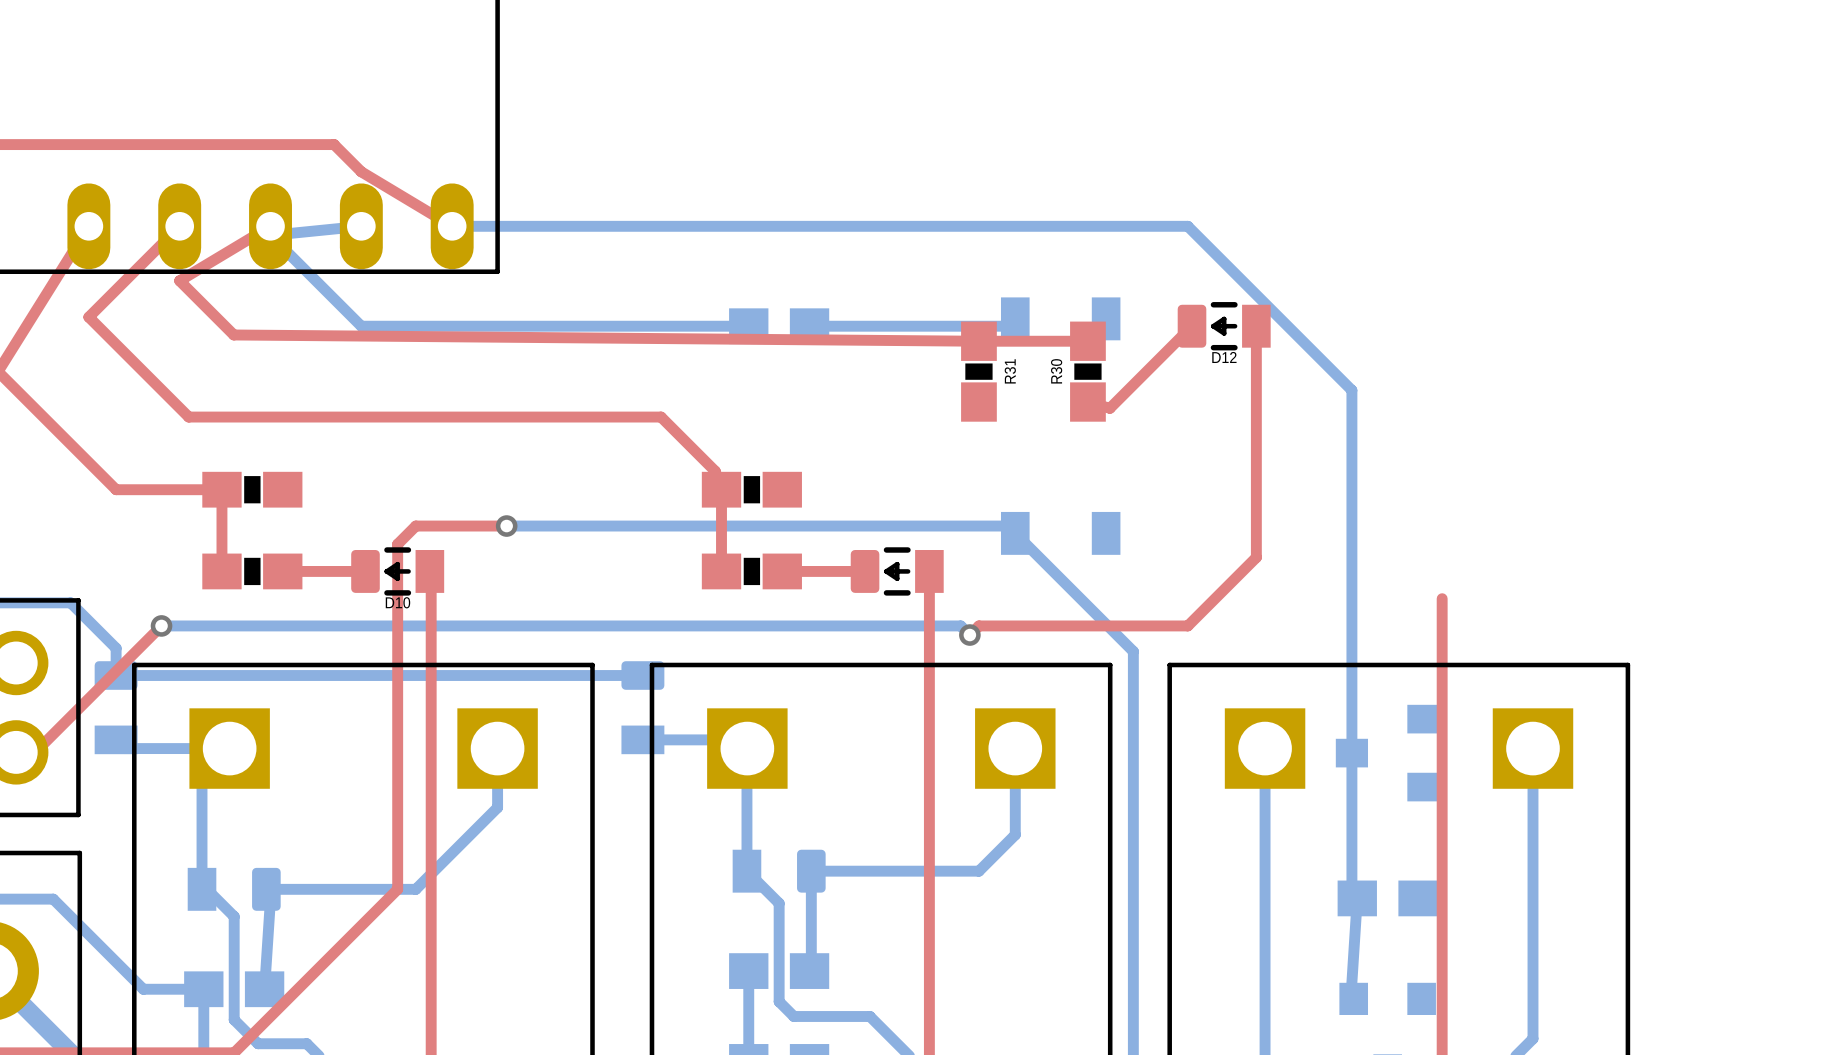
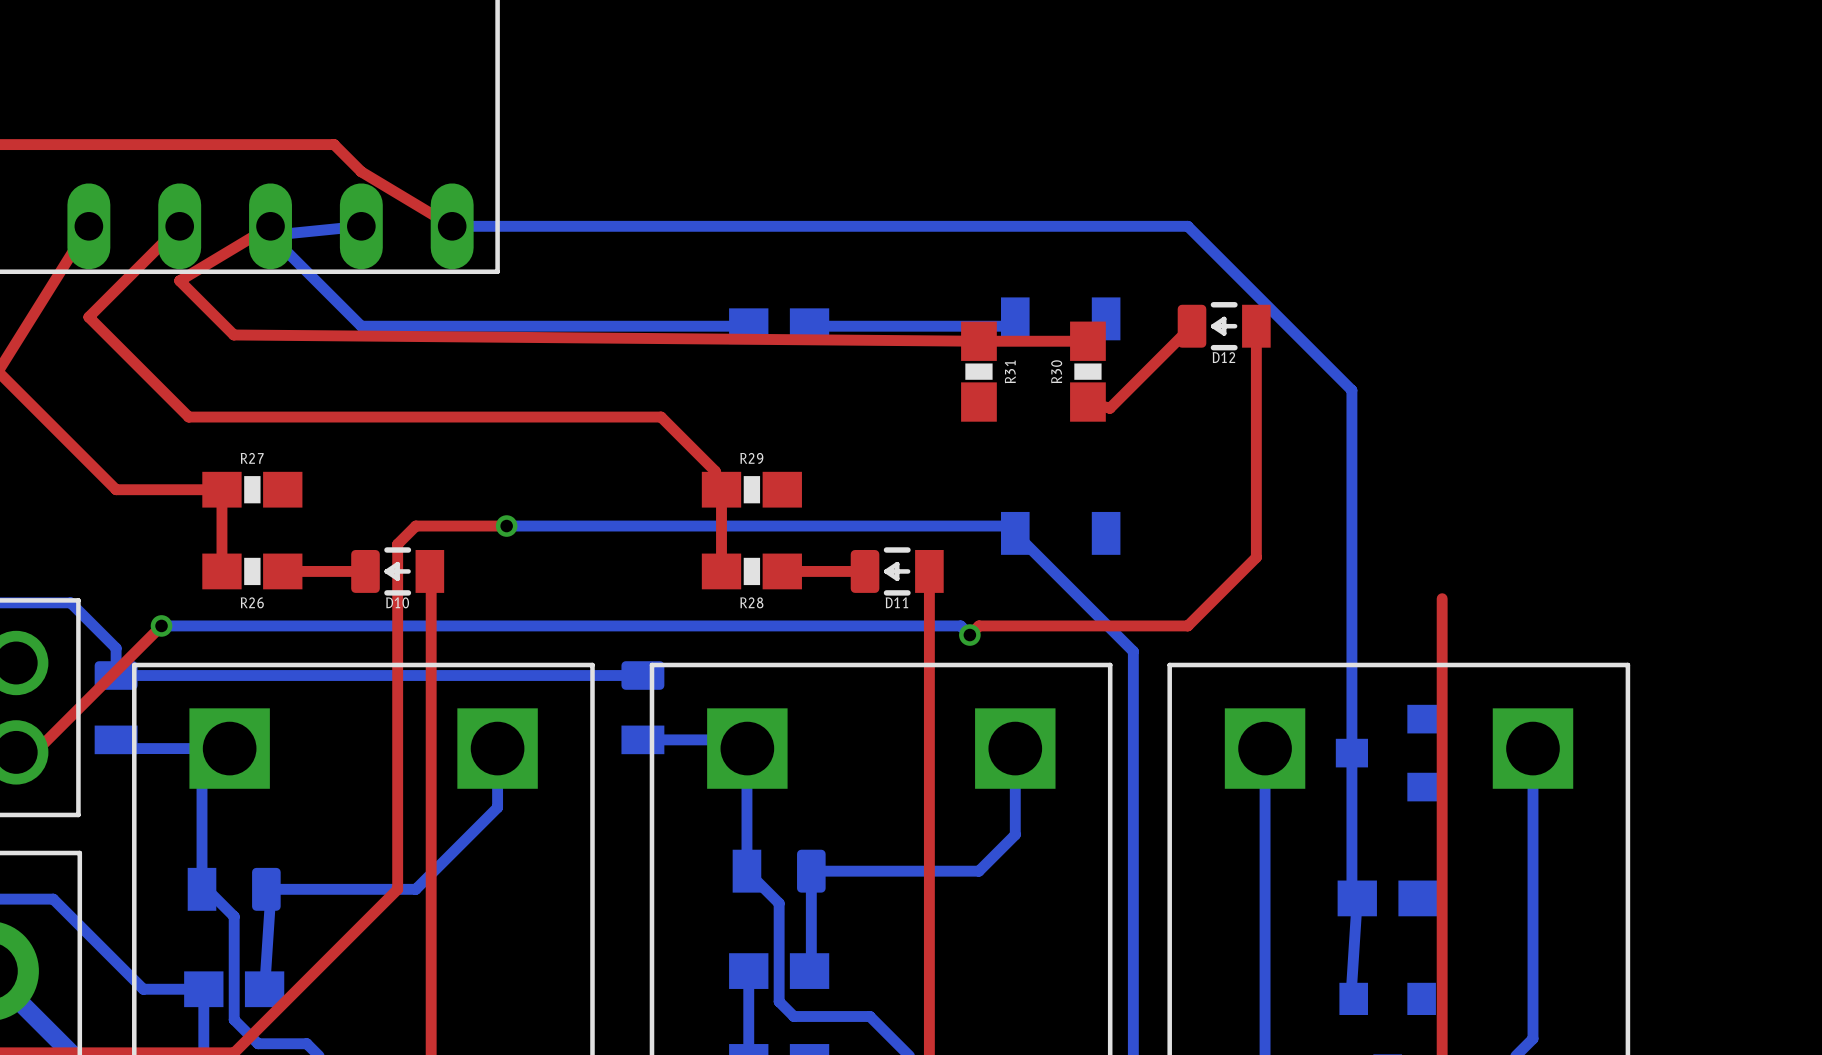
R27 name: none -> R27 (252, 458)
R29 name: none -> R29 (751, 458)
R26 name: none -> R26 (252, 602)
R28 name: none -> R28 (751, 602)
D11 name: none -> D11 (896, 602)

